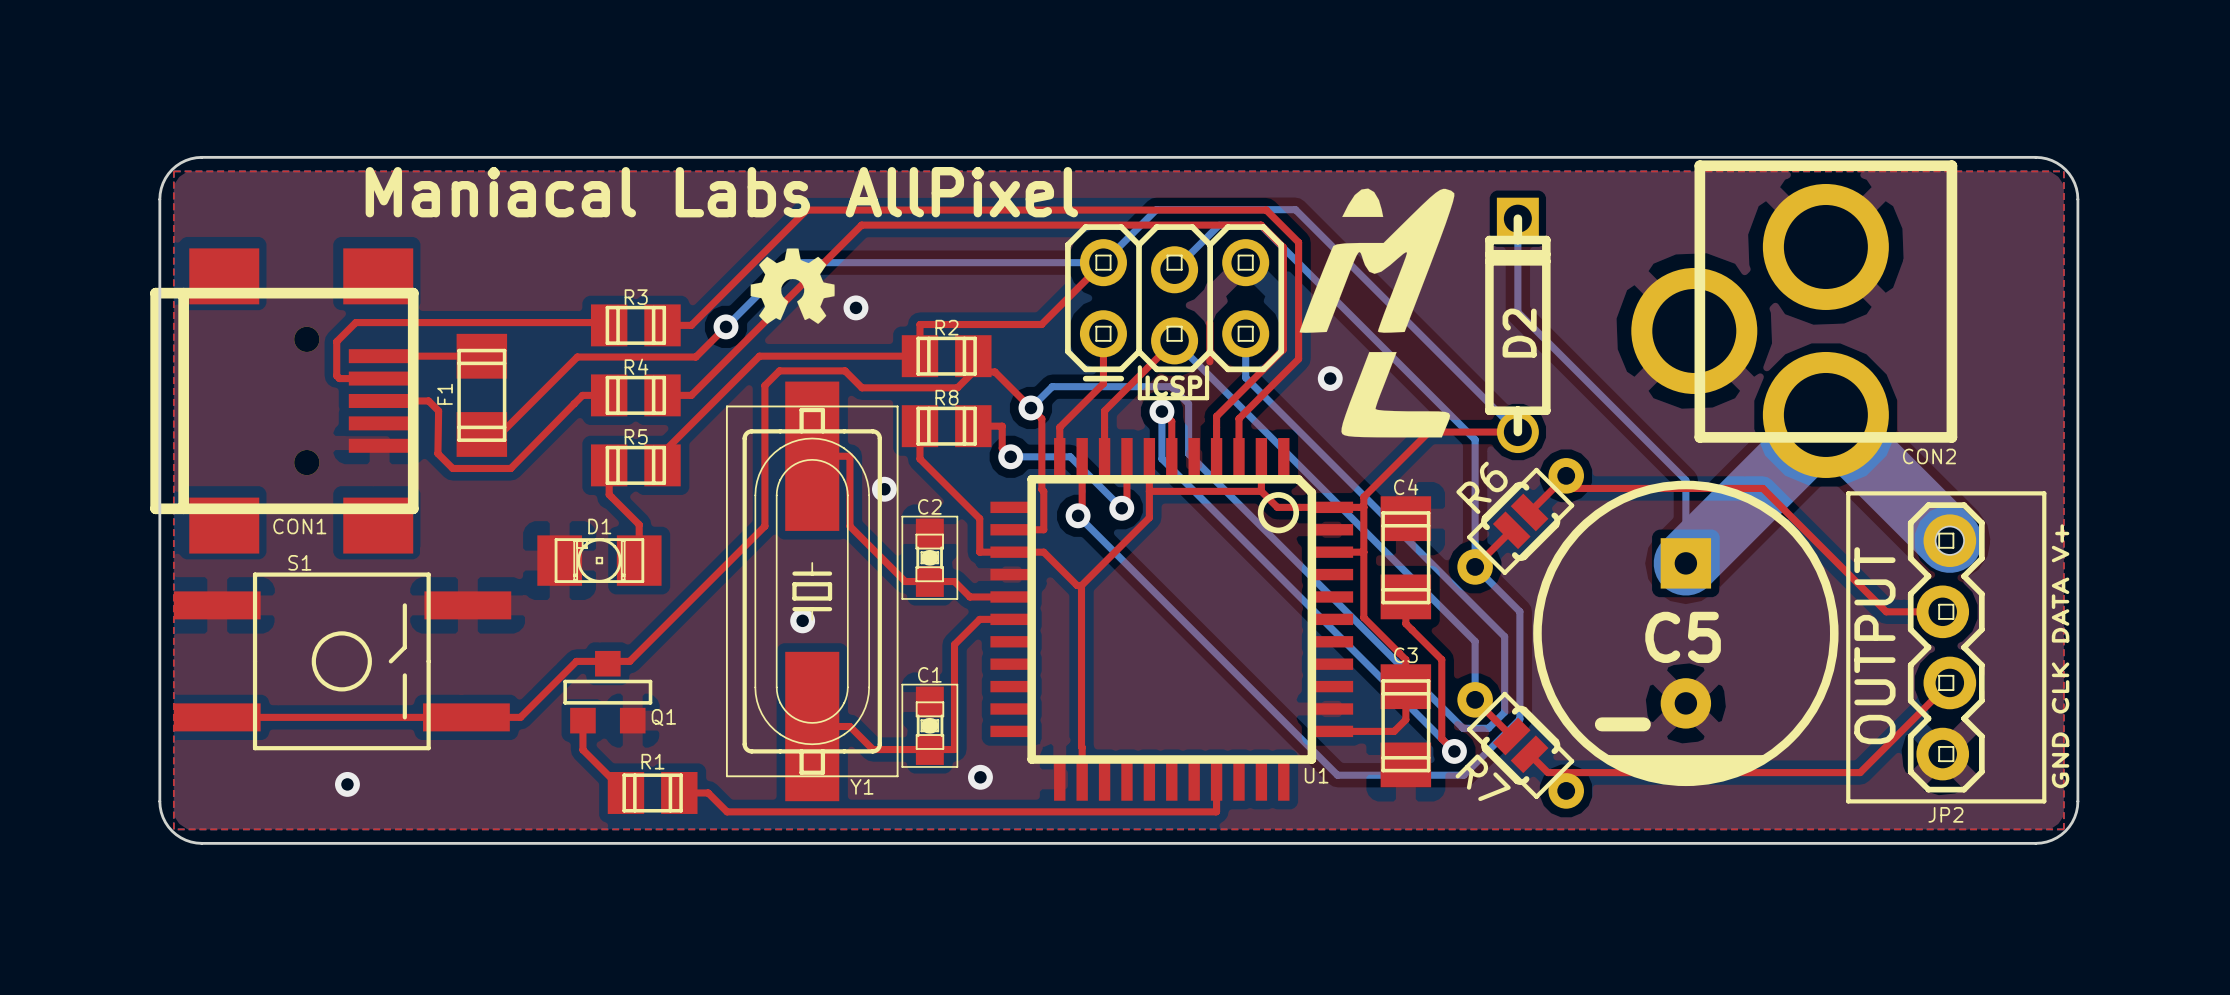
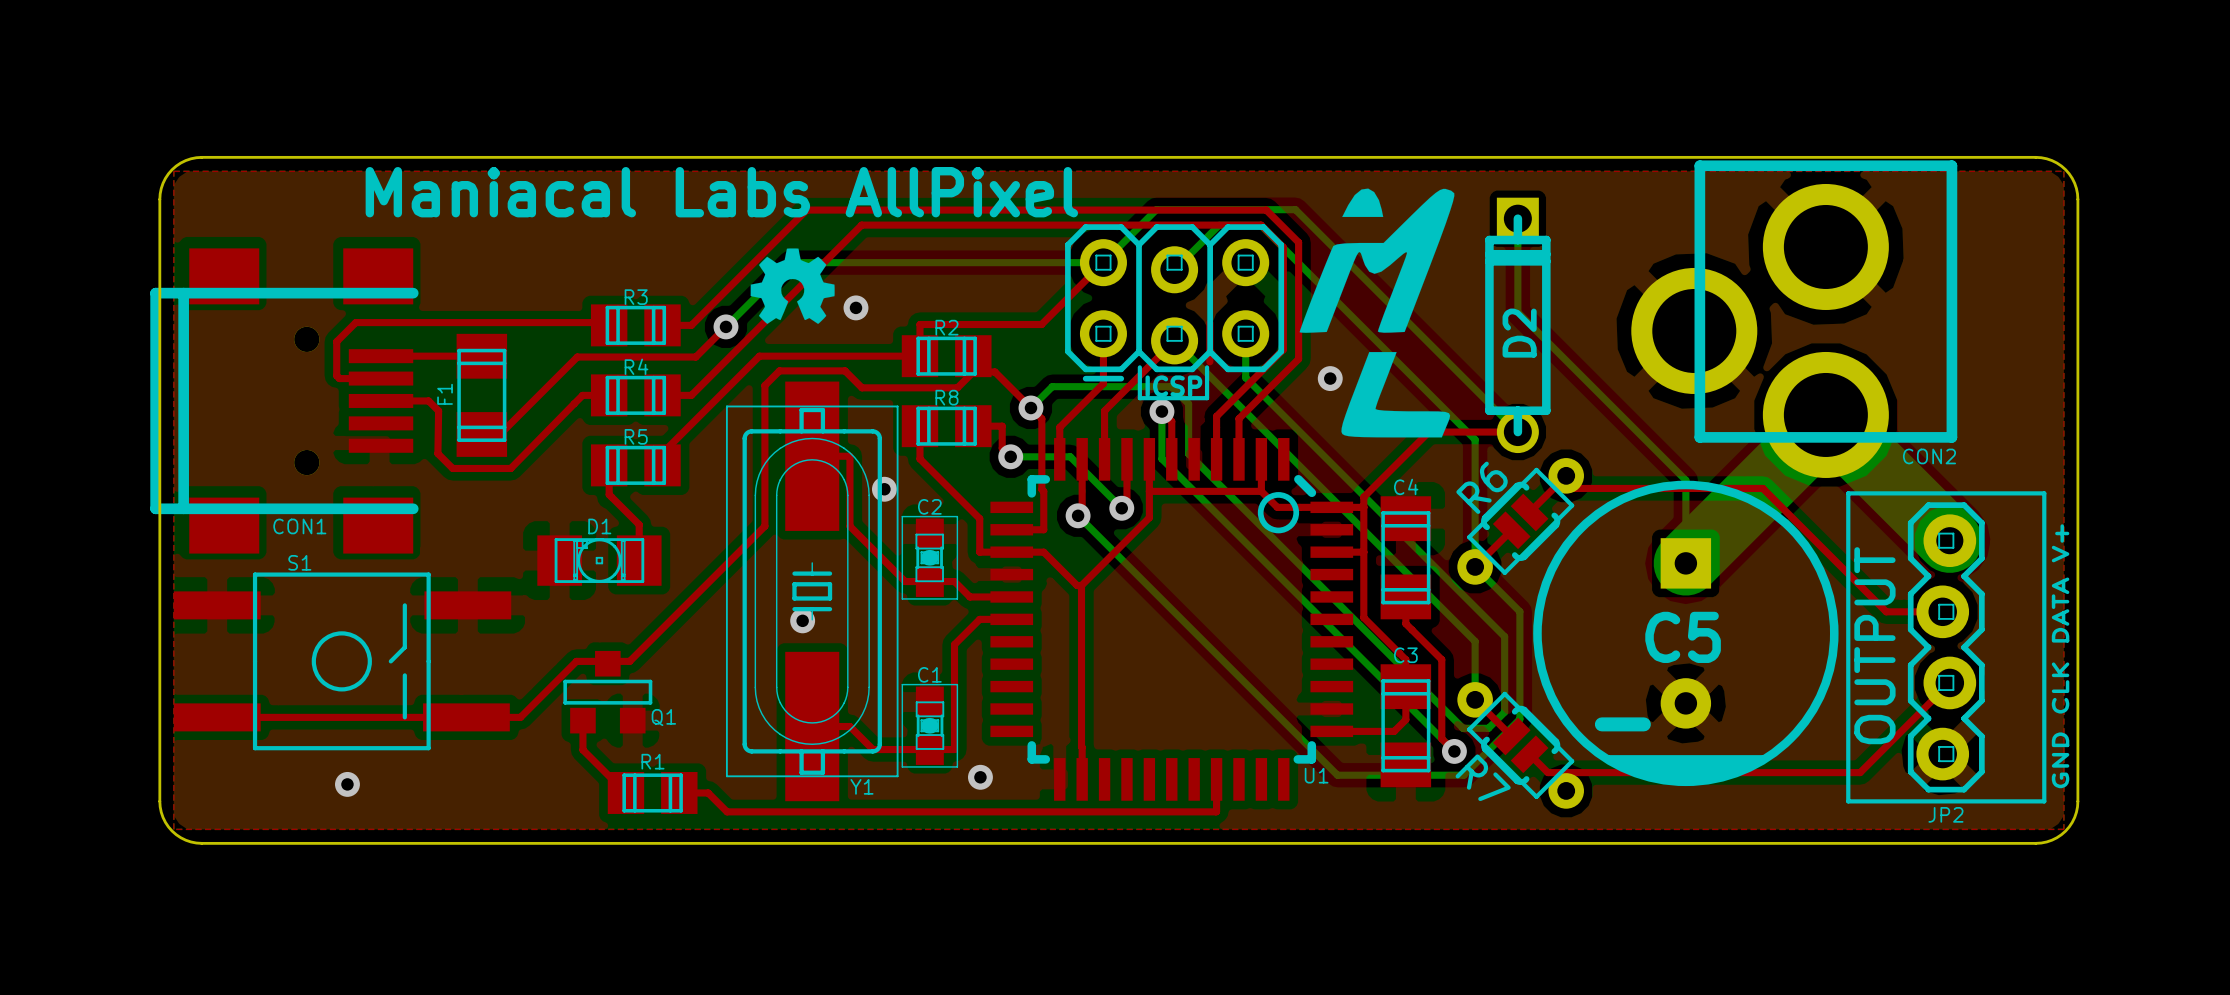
CON1 footprint: [150, 248, 419, 554] -> [150, 248, 419, 554]
U1 footprint: [990, 438, 1354, 801] -> [990, 438, 1354, 801]

